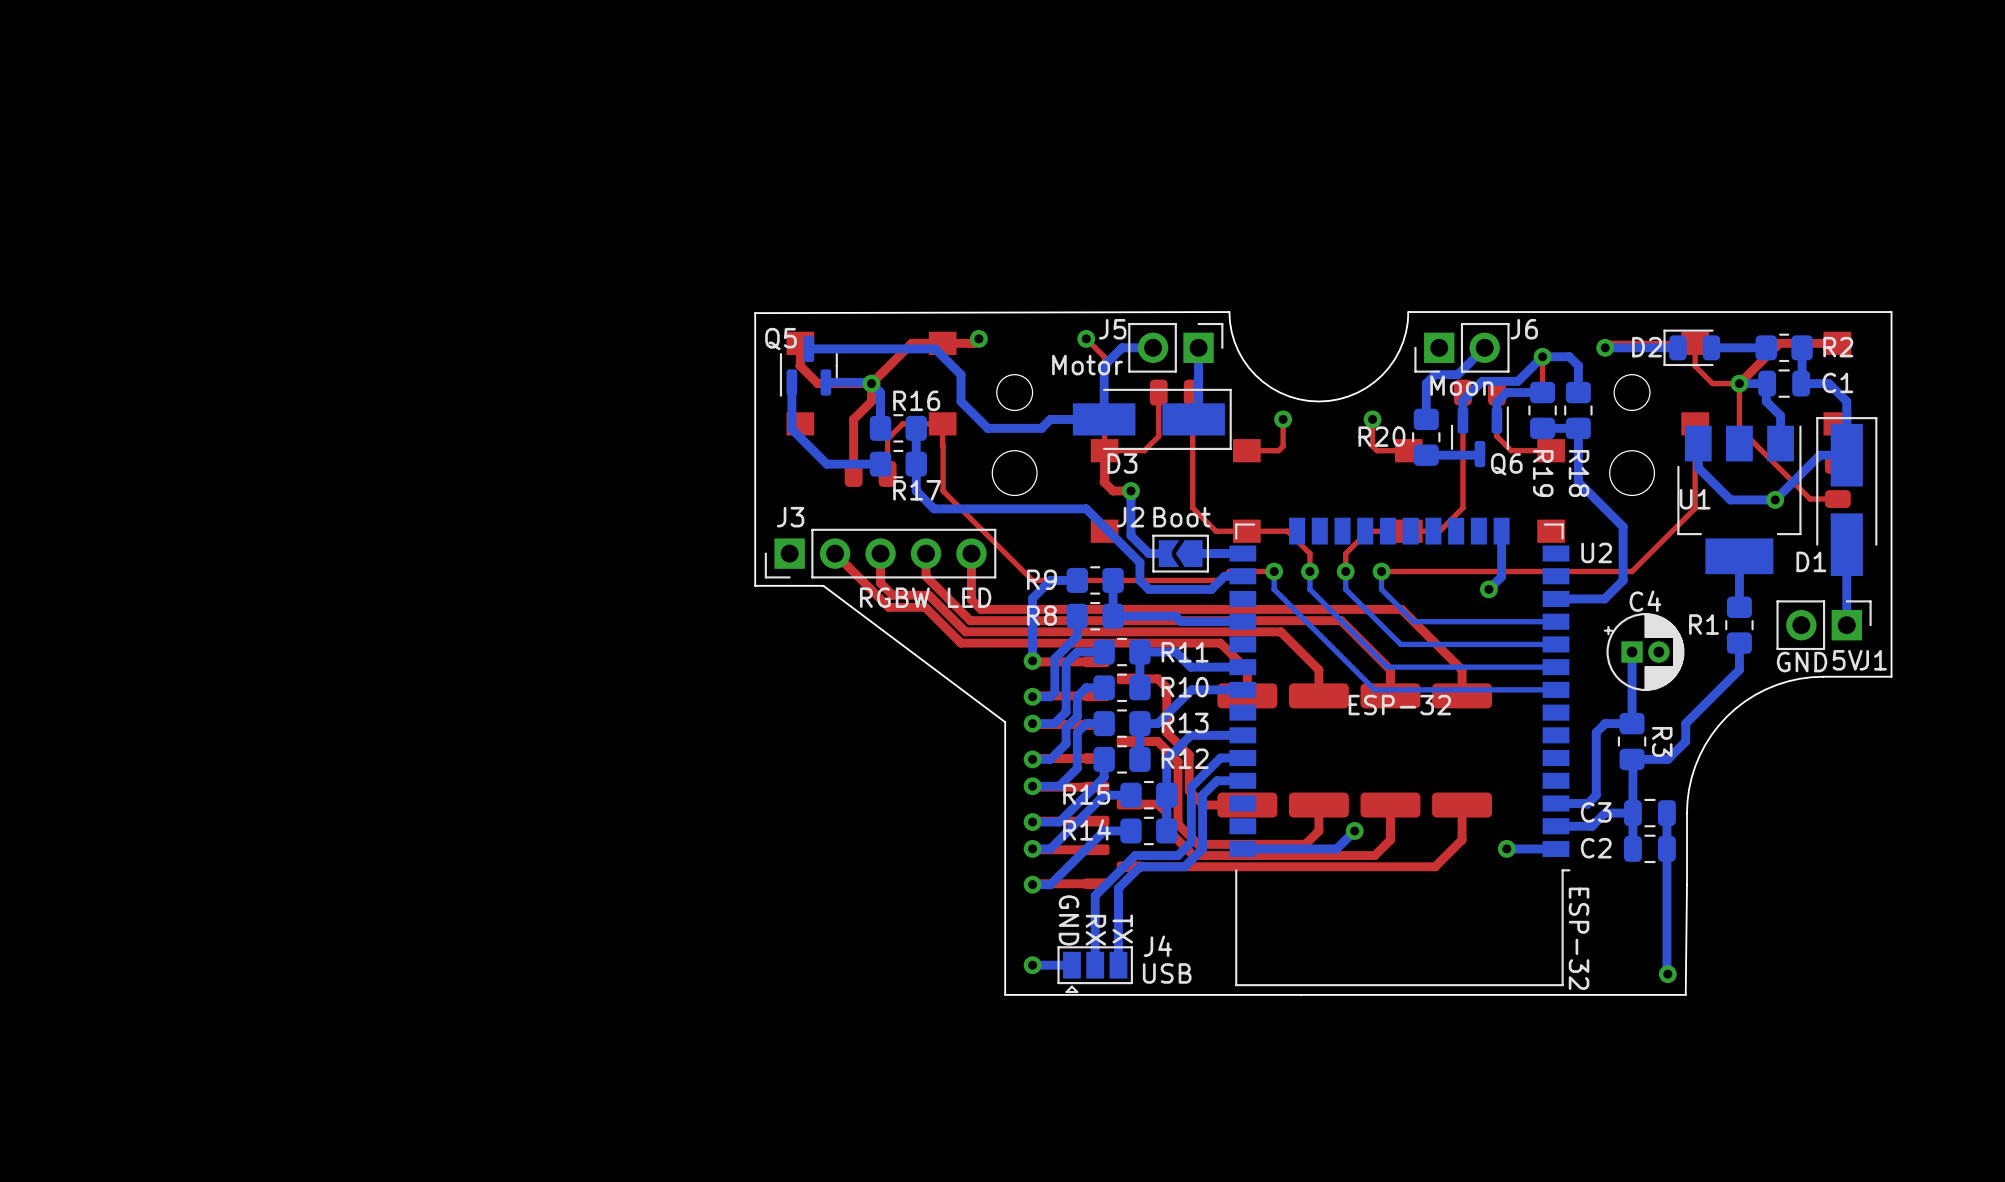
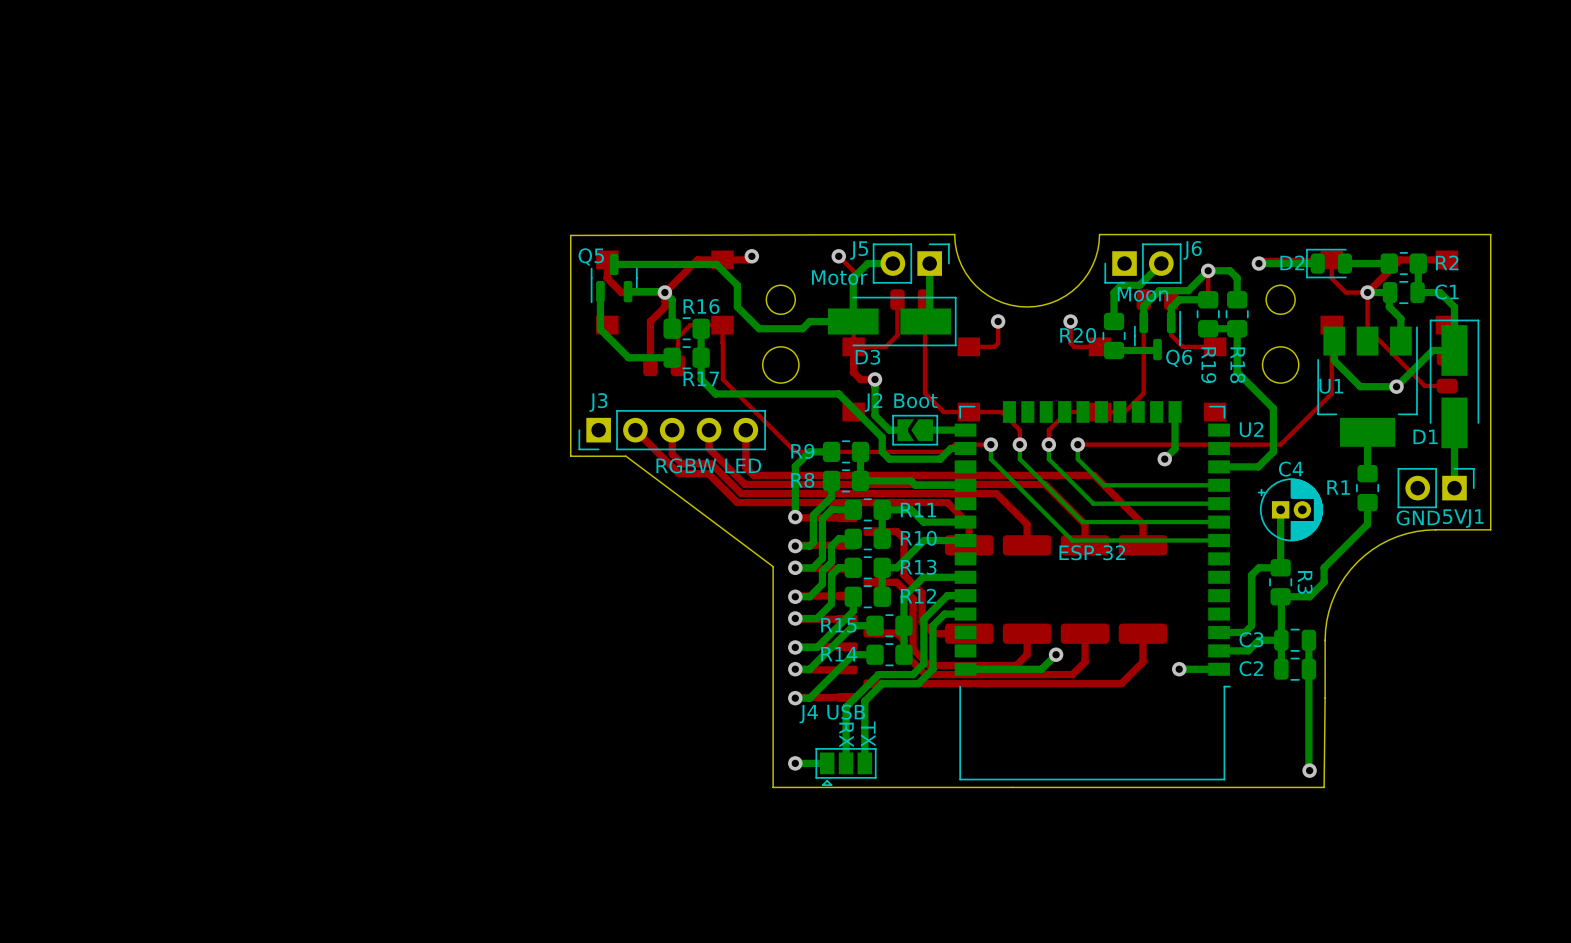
J4 text: GND (1069, 920) -> none
text: ESP-32 (1579, 938) -> none
J4 name position: J4 (1157, 946) -> J4 (808, 714)
J4 text position: USB (1167, 973) -> USB (846, 712)

